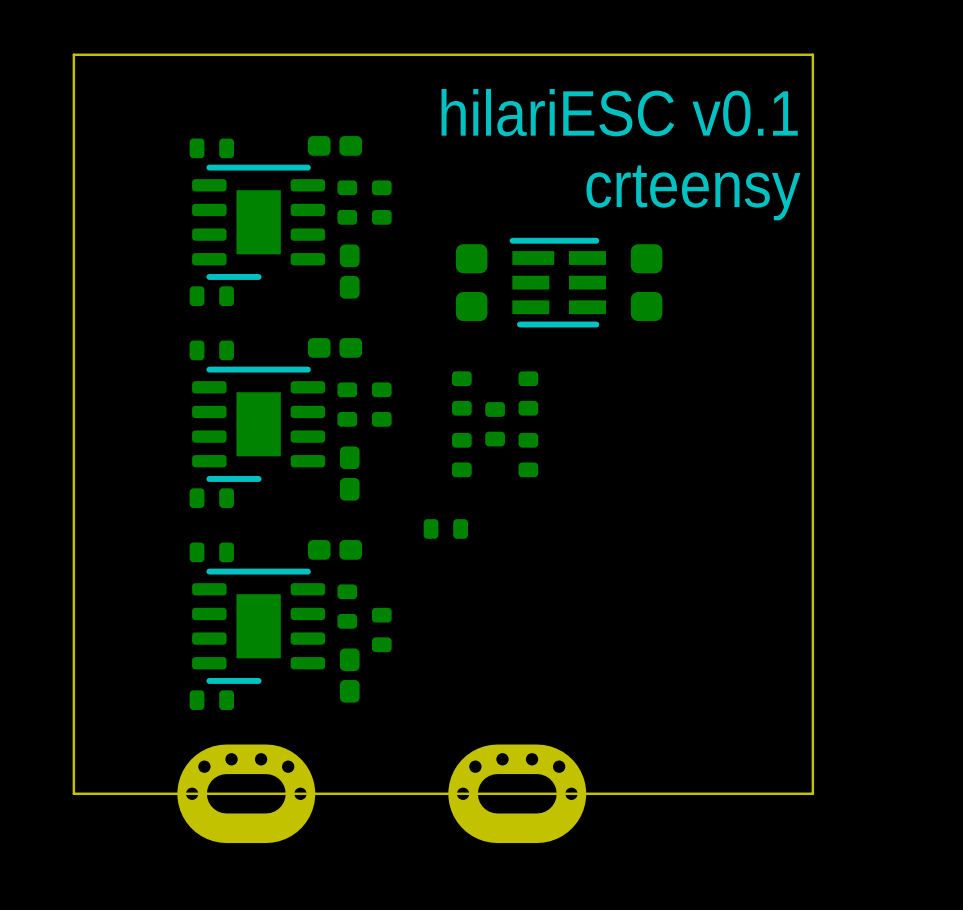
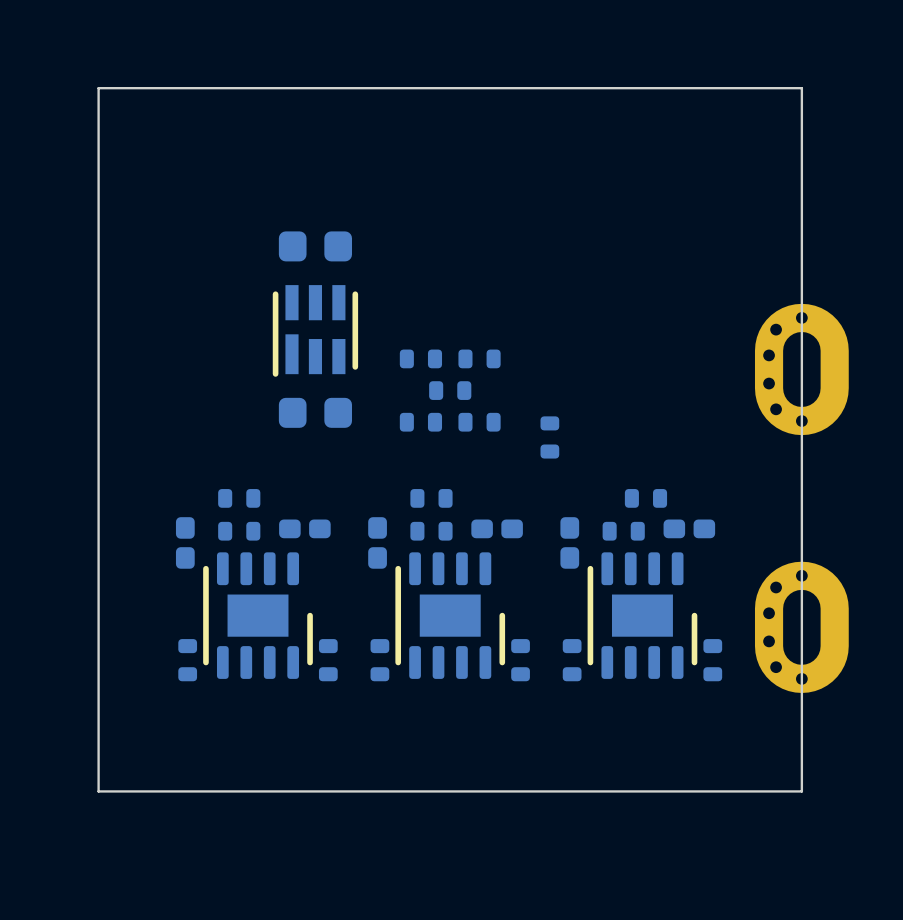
text: hilariESC v0.1 (619, 112) -> none
part: (334, 145) -> none
part: (211, 148) -> none
text: crteensy (693, 192) -> none
part: (347, 202) -> none
part: (381, 202) -> none
part: none -> (315, 246)
part: (258, 222) -> none
part: (349, 271) -> none
part: (471, 282) -> none
part rotation: 0° (557, 282) -> 90° counterclockwise (315, 330)
part position: (557, 282) -> (315, 330)
part: (646, 282) -> none
part: (211, 296) -> none
part: none -> (420, 358)
part: none -> (479, 358)
part: (334, 347) -> none
part: (211, 350) -> none
part: none -> (801, 369)
part: none -> (450, 390)
part: (461, 393) -> none
part: (528, 393) -> none
part: none -> (315, 412)
part: (347, 404) -> none
part: (381, 404) -> none
part: none -> (420, 422)
part: none -> (479, 422)
part: none -> (549, 437)
part: (258, 424) -> none
part: (495, 424) -> none
part: (461, 455) -> none
part: (528, 455) -> none
part: (349, 473) -> none
part: none -> (239, 498)
part: none -> (431, 498)
part: none -> (645, 498)
part: (211, 498) -> none
part: none -> (304, 528)
part: none -> (497, 528)
part: none -> (689, 528)
part: none -> (239, 531)
part: none -> (431, 531)
part: none -> (623, 531)
part: (445, 528) -> none
part: none -> (185, 542)
part: none -> (377, 542)
part: none -> (569, 542)
part: (334, 549) -> none
part: (211, 552) -> none
part: (347, 606) -> none
part: none -> (450, 615)
part: none -> (642, 615)
part: none -> (801, 627)
part rotation: 0° (258, 626) -> 90° counterclockwise (258, 615)
part: (381, 629) -> none
part: none -> (187, 660)
part: none -> (328, 660)
part: none -> (379, 660)
part: none -> (520, 660)
part: none -> (572, 660)
part: none -> (712, 660)
part: (349, 675) -> none
part: (211, 700) -> none
part: (246, 793) -> none
part: (517, 793) -> none

